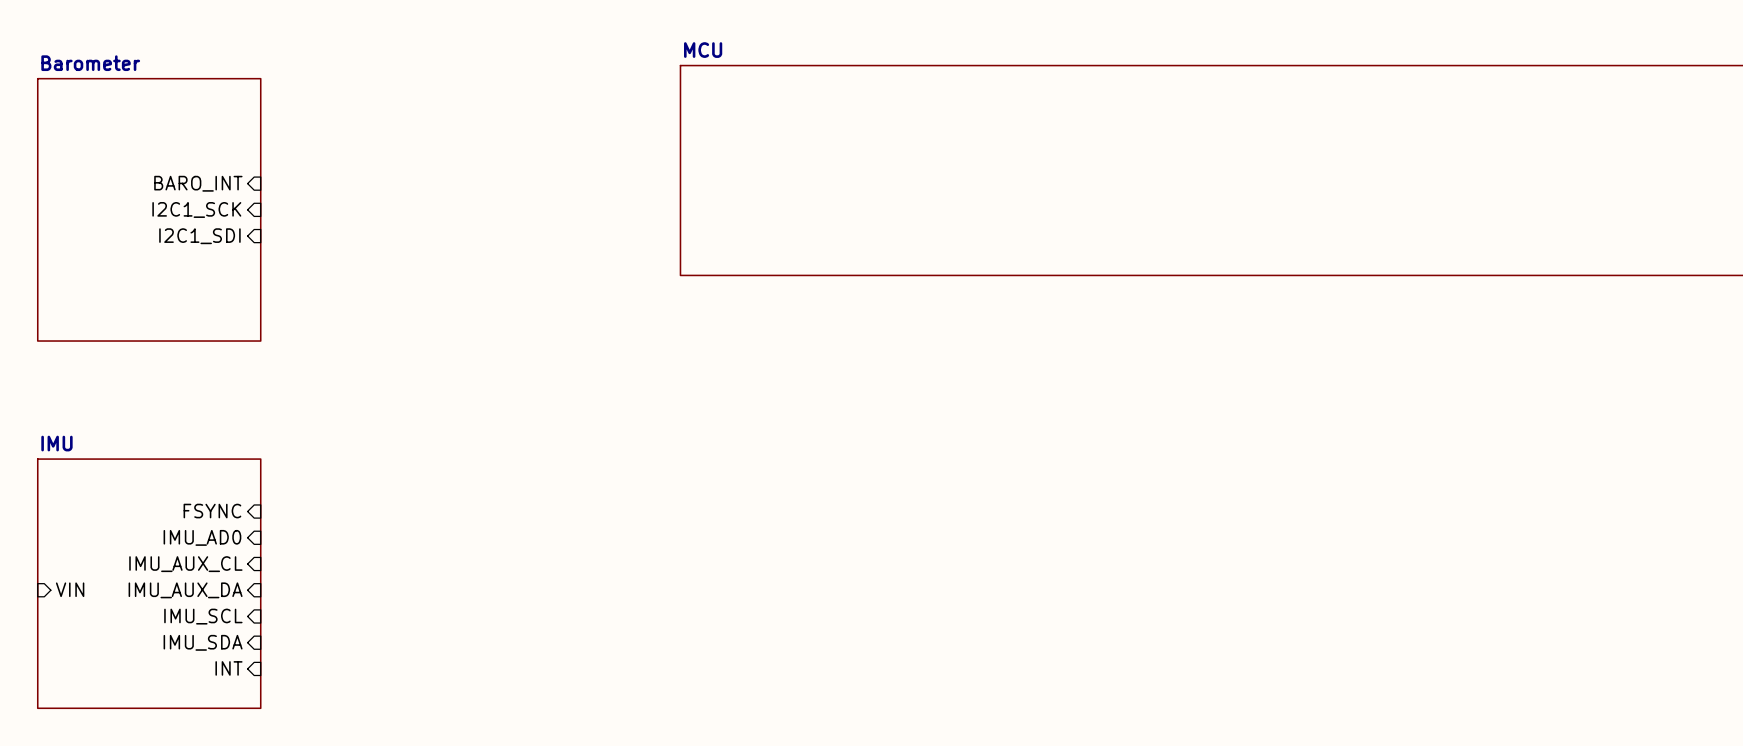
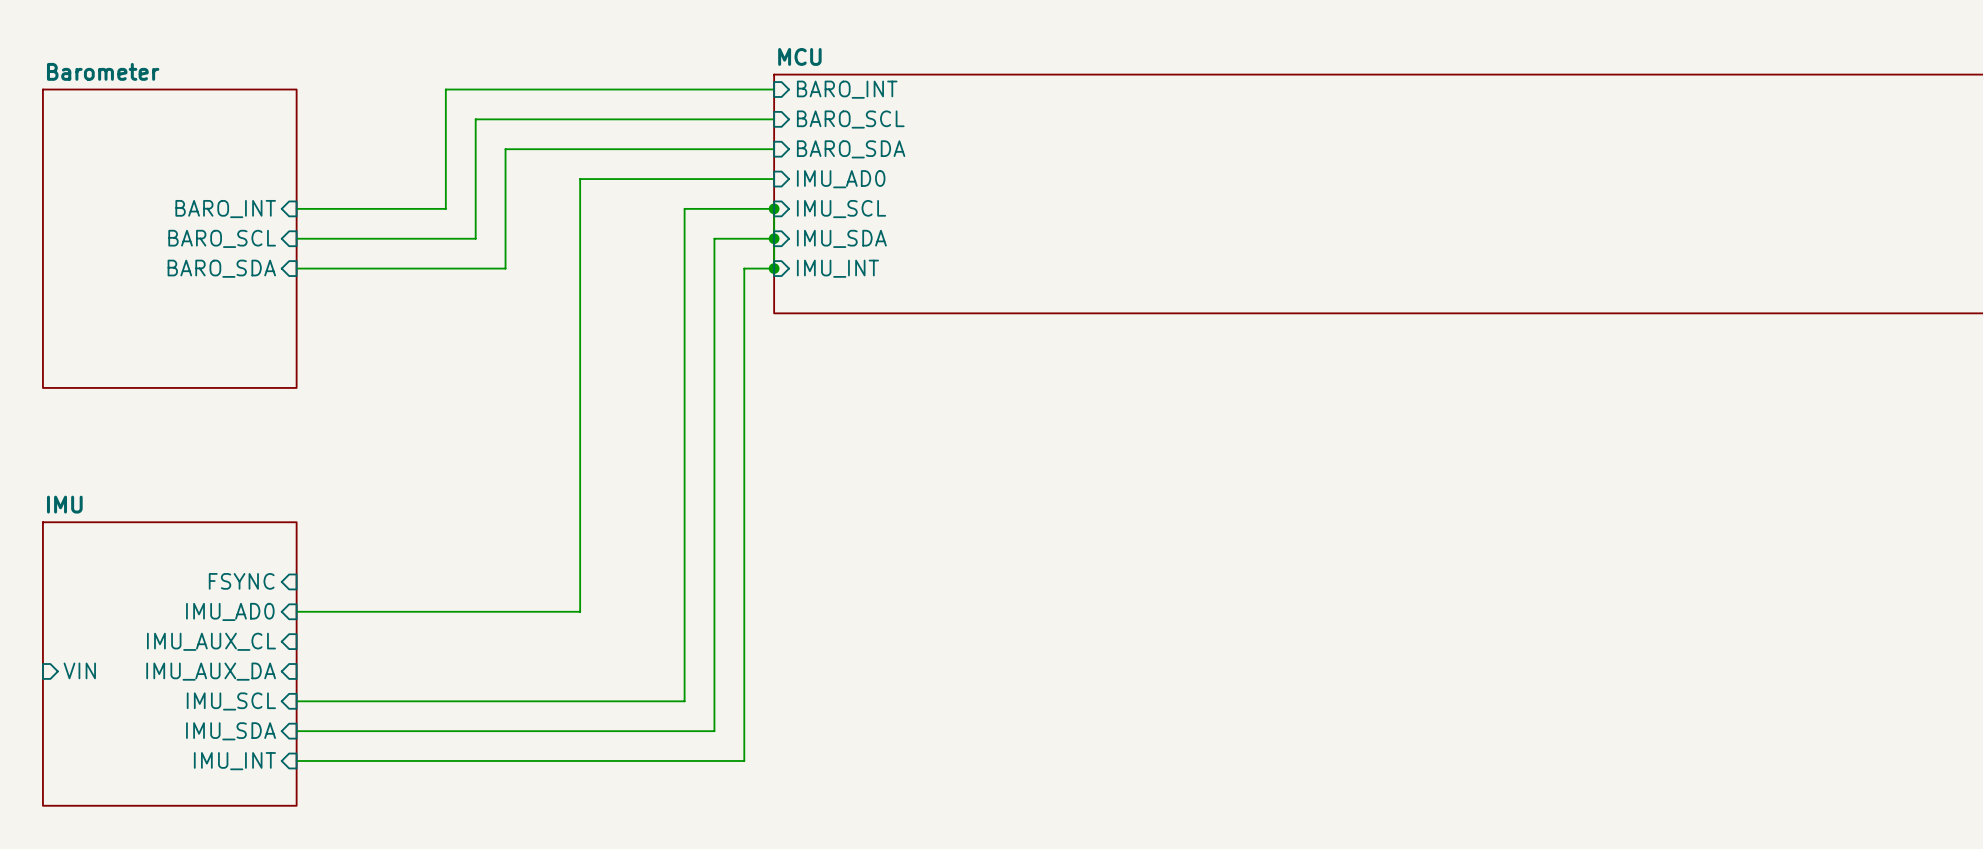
wire: none -> (774, 89) (445, 89) (445, 208) (296, 208)
sheet pin: none -> BARO_INT (847, 89)
wire: none -> (774, 119) (475, 119) (475, 238) (296, 238)
sheet pin: none -> BARO_SCL (850, 119)
wire: none -> (774, 149) (505, 149) (505, 268) (296, 268)
sheet pin: none -> BARO_SDA (851, 149)
wire: none -> (774, 179) (580, 179) (580, 611) (296, 611)
sheet pin: none -> IMU_AD0 (841, 179)
junction: none -> (774, 208)
sheet pin: none -> IMU_SCL (841, 209)
sheet pin: I2C1_SCK (196, 209) -> BARO_SCL (222, 238)
wire: none -> (774, 238) (714, 238) (714, 731) (296, 731)
junction: none -> (774, 238)
sheet pin: none -> IMU_SDA (841, 238)
sheet pin: I2C1_SDI (199, 236) -> BARO_SDA (221, 268)
junction: none -> (774, 268)
sheet pin: none -> IMU_INT (837, 268)
wire: none -> (296, 701) (684, 701) (684, 208) (774, 208) (774, 268) (744, 268) (744, 761) (296, 761)
sheet pin: INT (228, 668) -> IMU_INT (234, 761)

